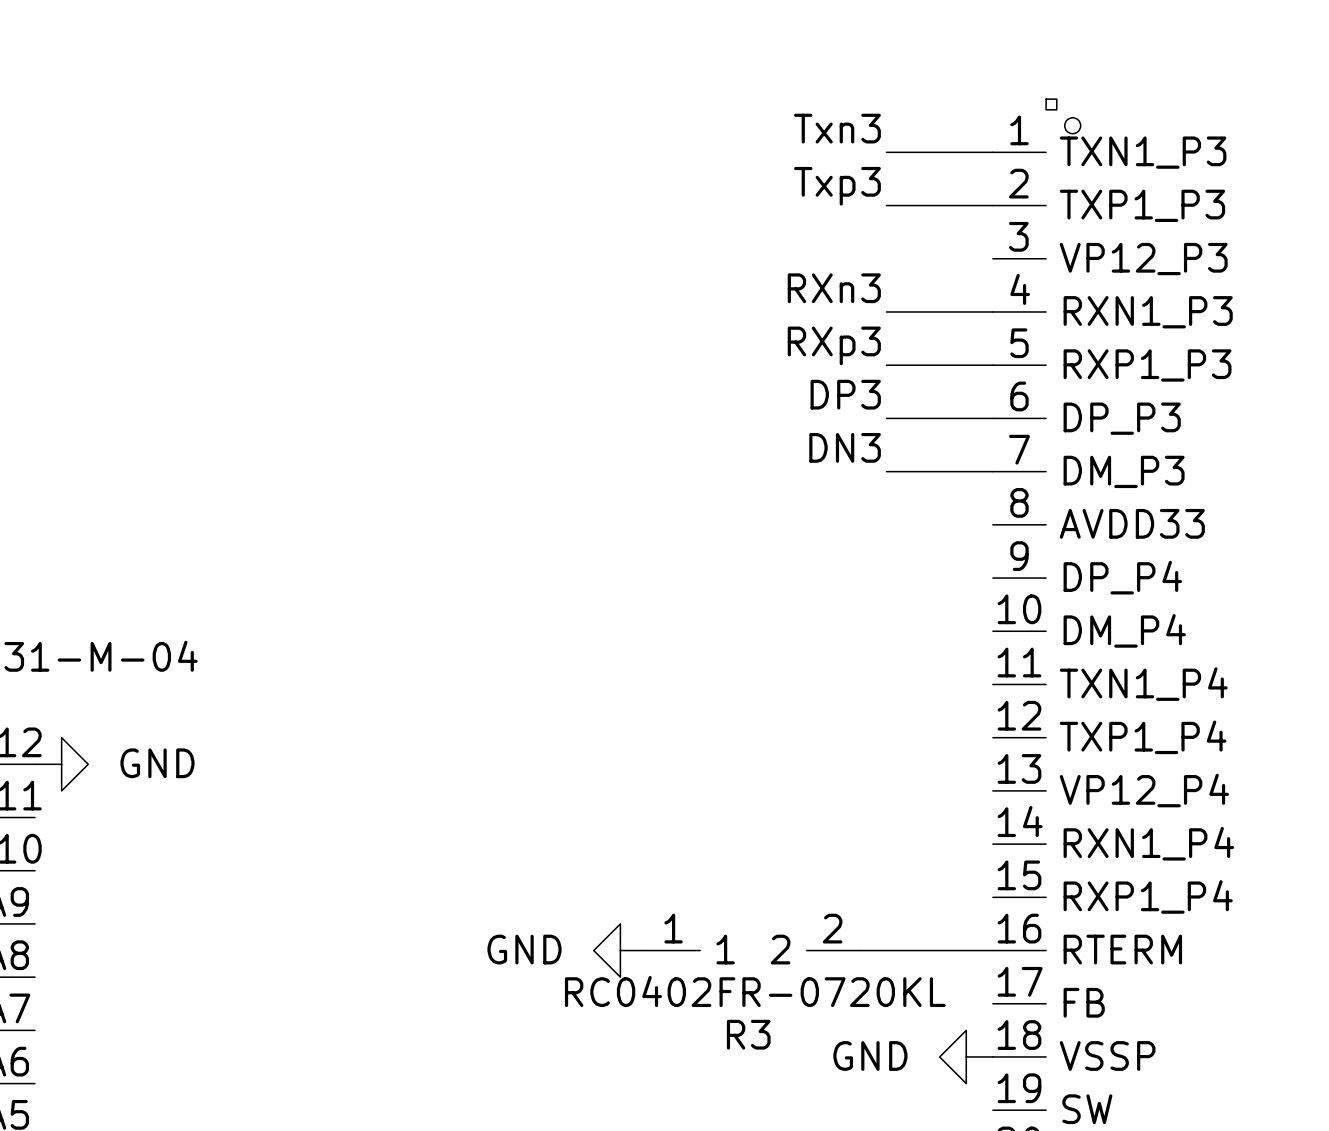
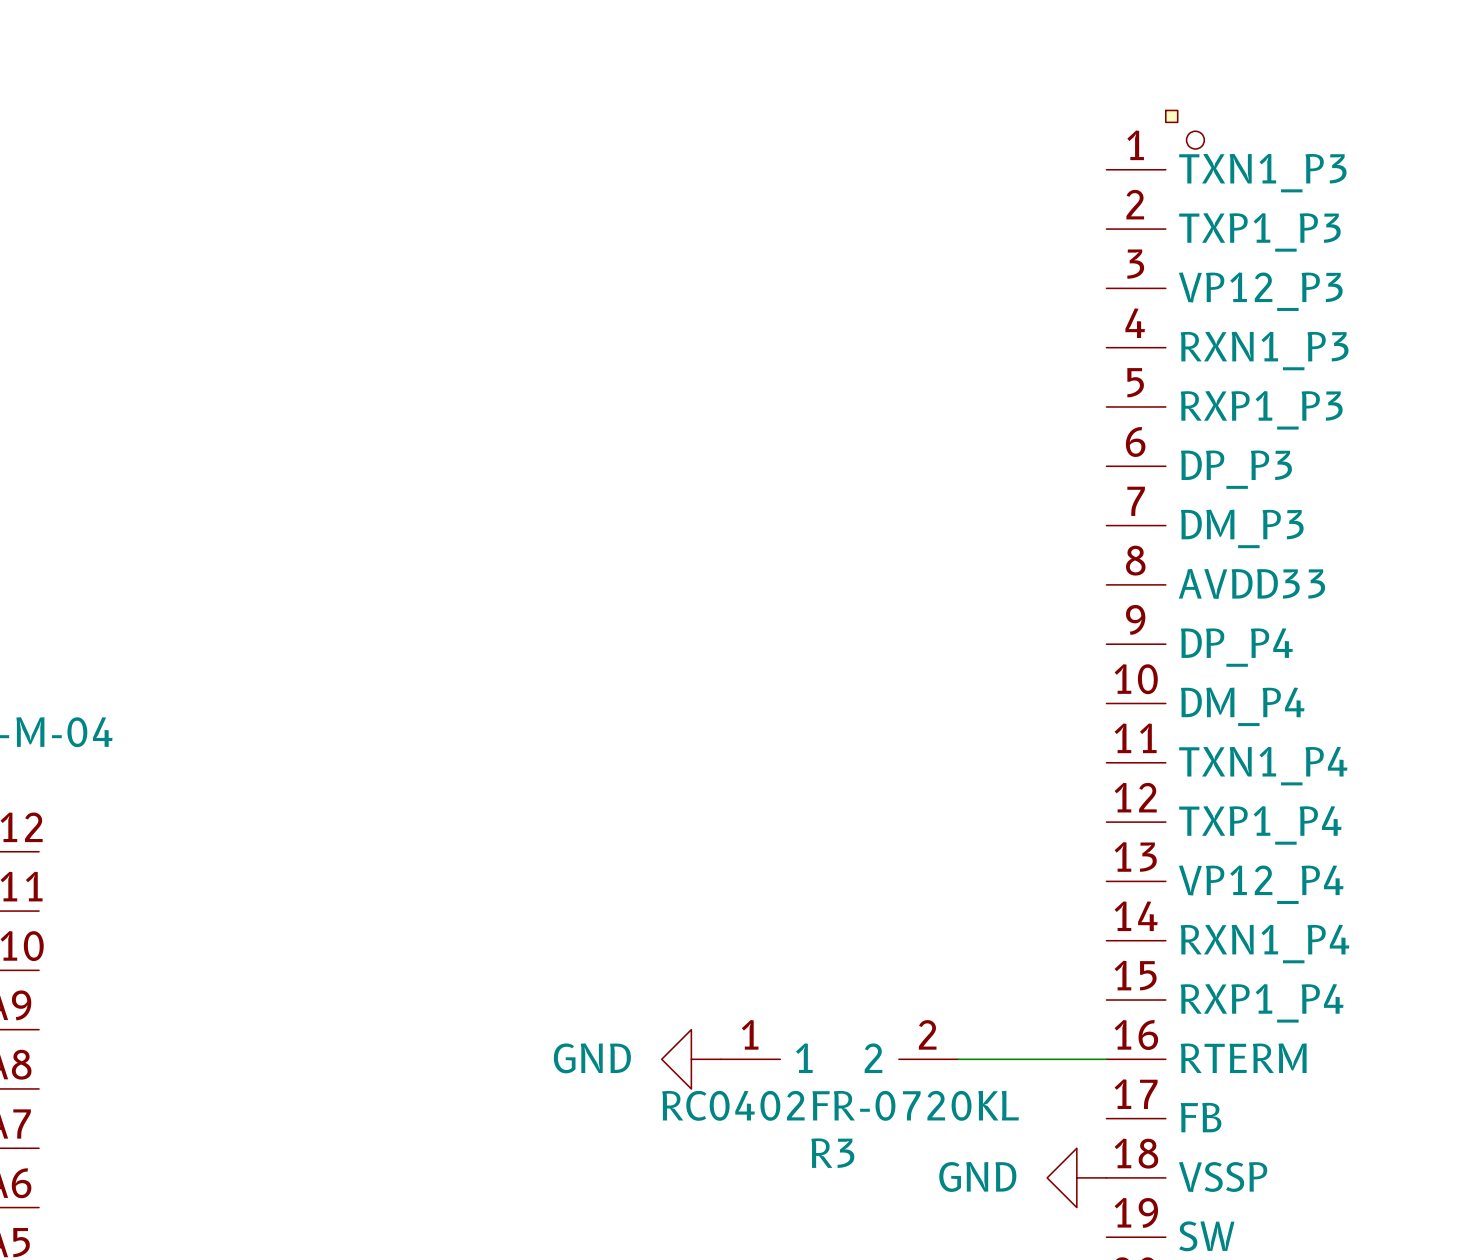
label: Txn3 (837, 128) -> none
wire: (886, 152) (992, 152) -> none
label: Txp3 (837, 186) -> none
wire: (886, 205) (992, 205) -> none
label: RXn3 (834, 288) -> none
wire: (886, 311) (992, 311) -> none
label: RXp3 (834, 345) -> none
wire: (886, 365) (992, 365) -> none
label: DP3 (845, 394) -> none
wire: (886, 418) (992, 418) -> none
label: DN3 (845, 447) -> none
wire: (886, 471) (992, 471) -> none
power symbol: GND (61, 764) -> none

